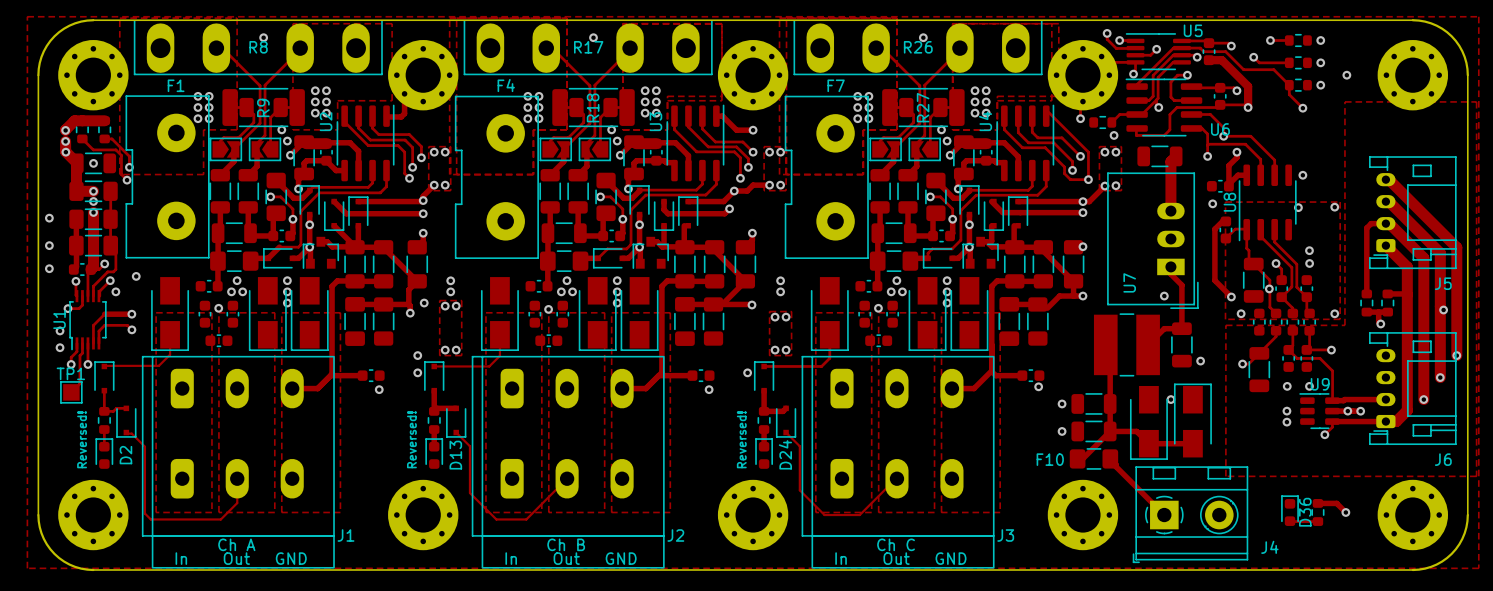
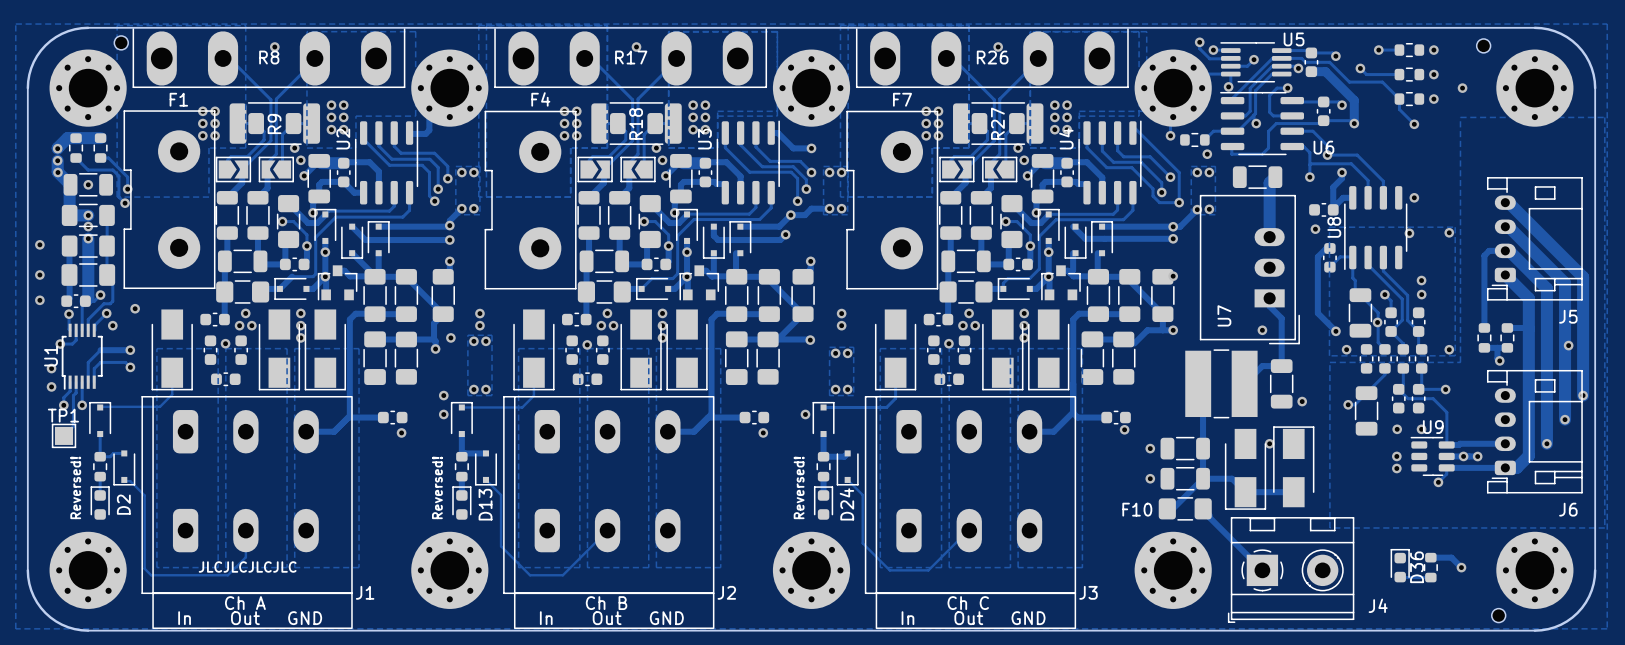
part: none -> (121, 42)
part: none -> (1483, 45)
drawing: none -> [198, 561, 297, 573]
part: none -> (1498, 615)

